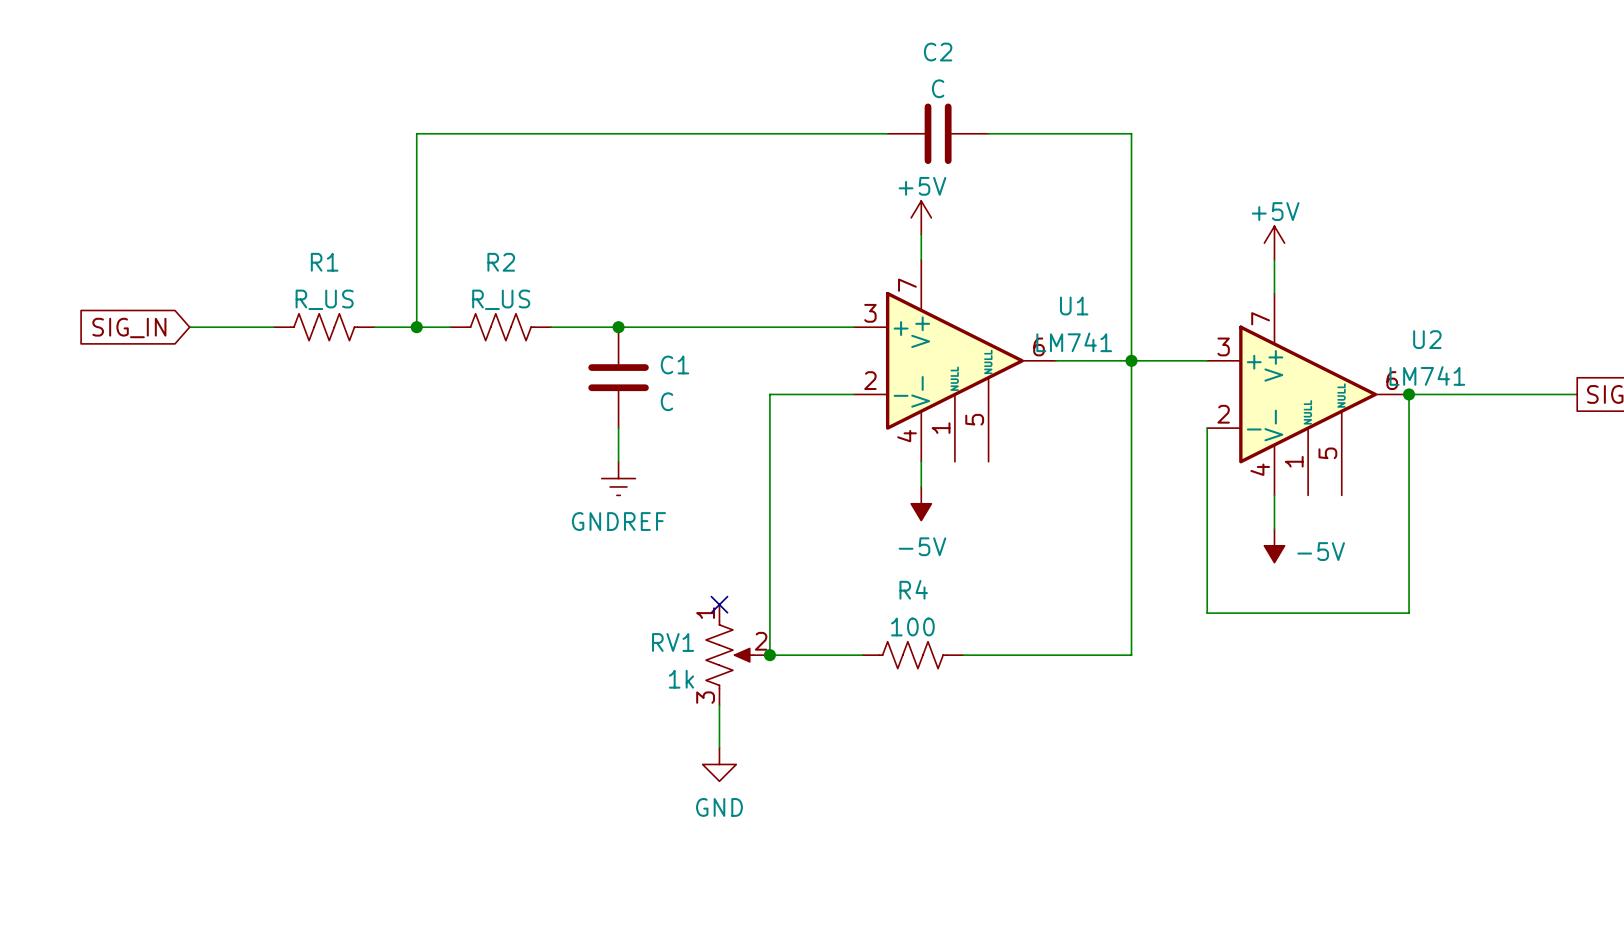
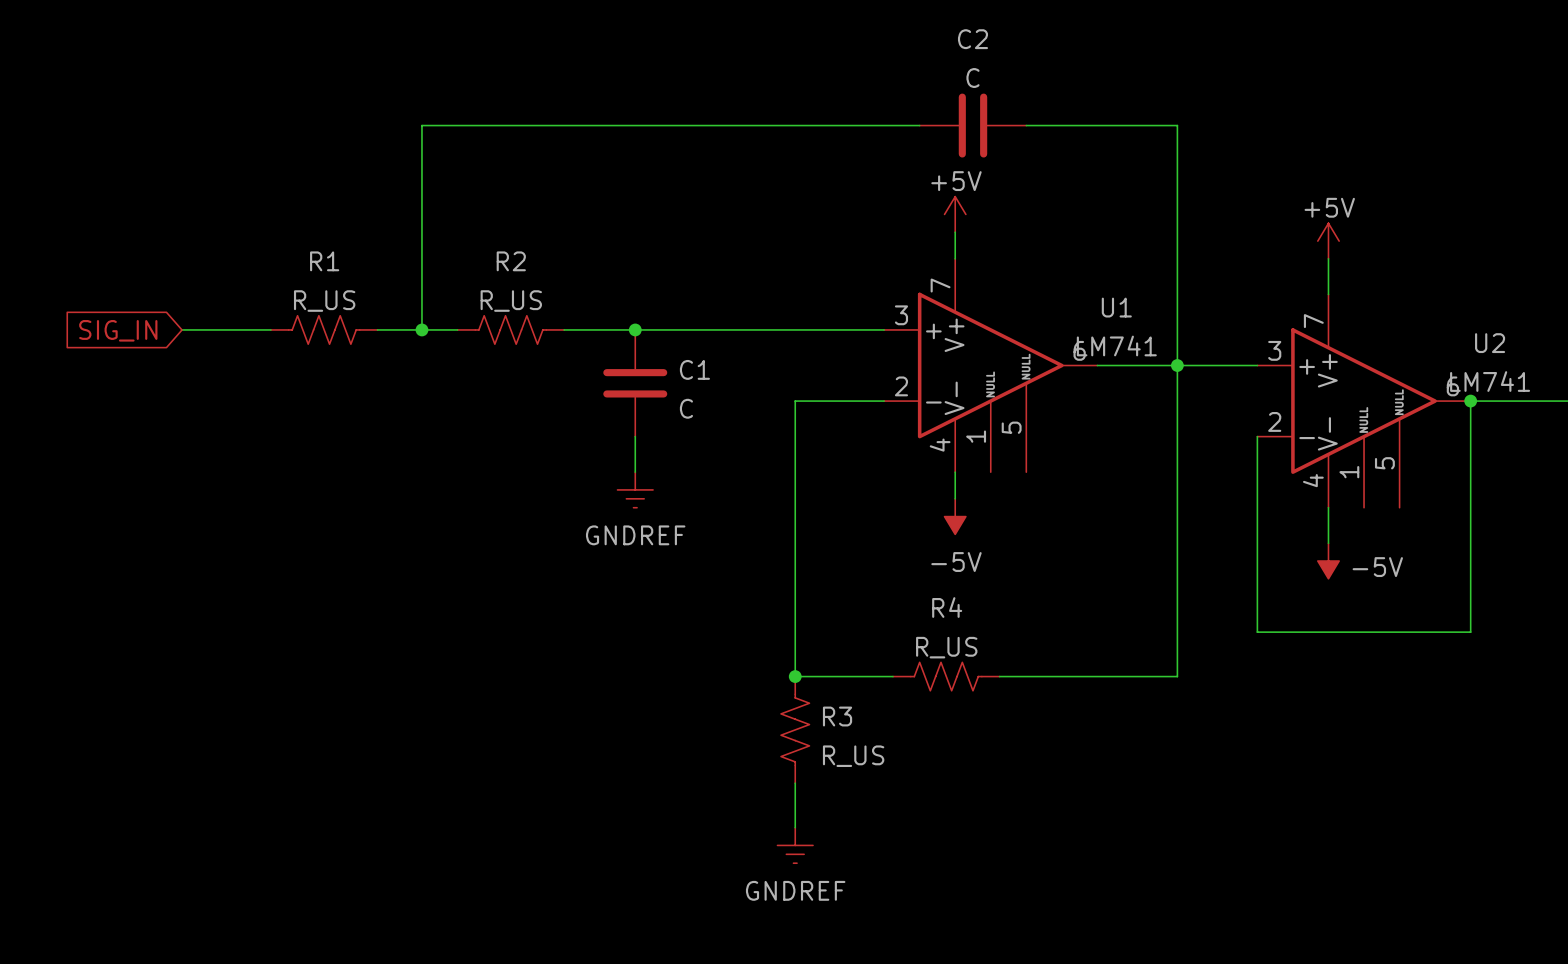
no-connect mark: (719, 604) -> none
R4 value: 100 (912, 626) -> R_US (946, 647)
RV1: 1k (737, 655) -> none
wire: (719, 705) (719, 747) -> (795, 783) (795, 827)
R3: none -> R_US (795, 729)
power symbol: GND (719, 764) -> none
power symbol: none -> GNDREF (795, 845)

